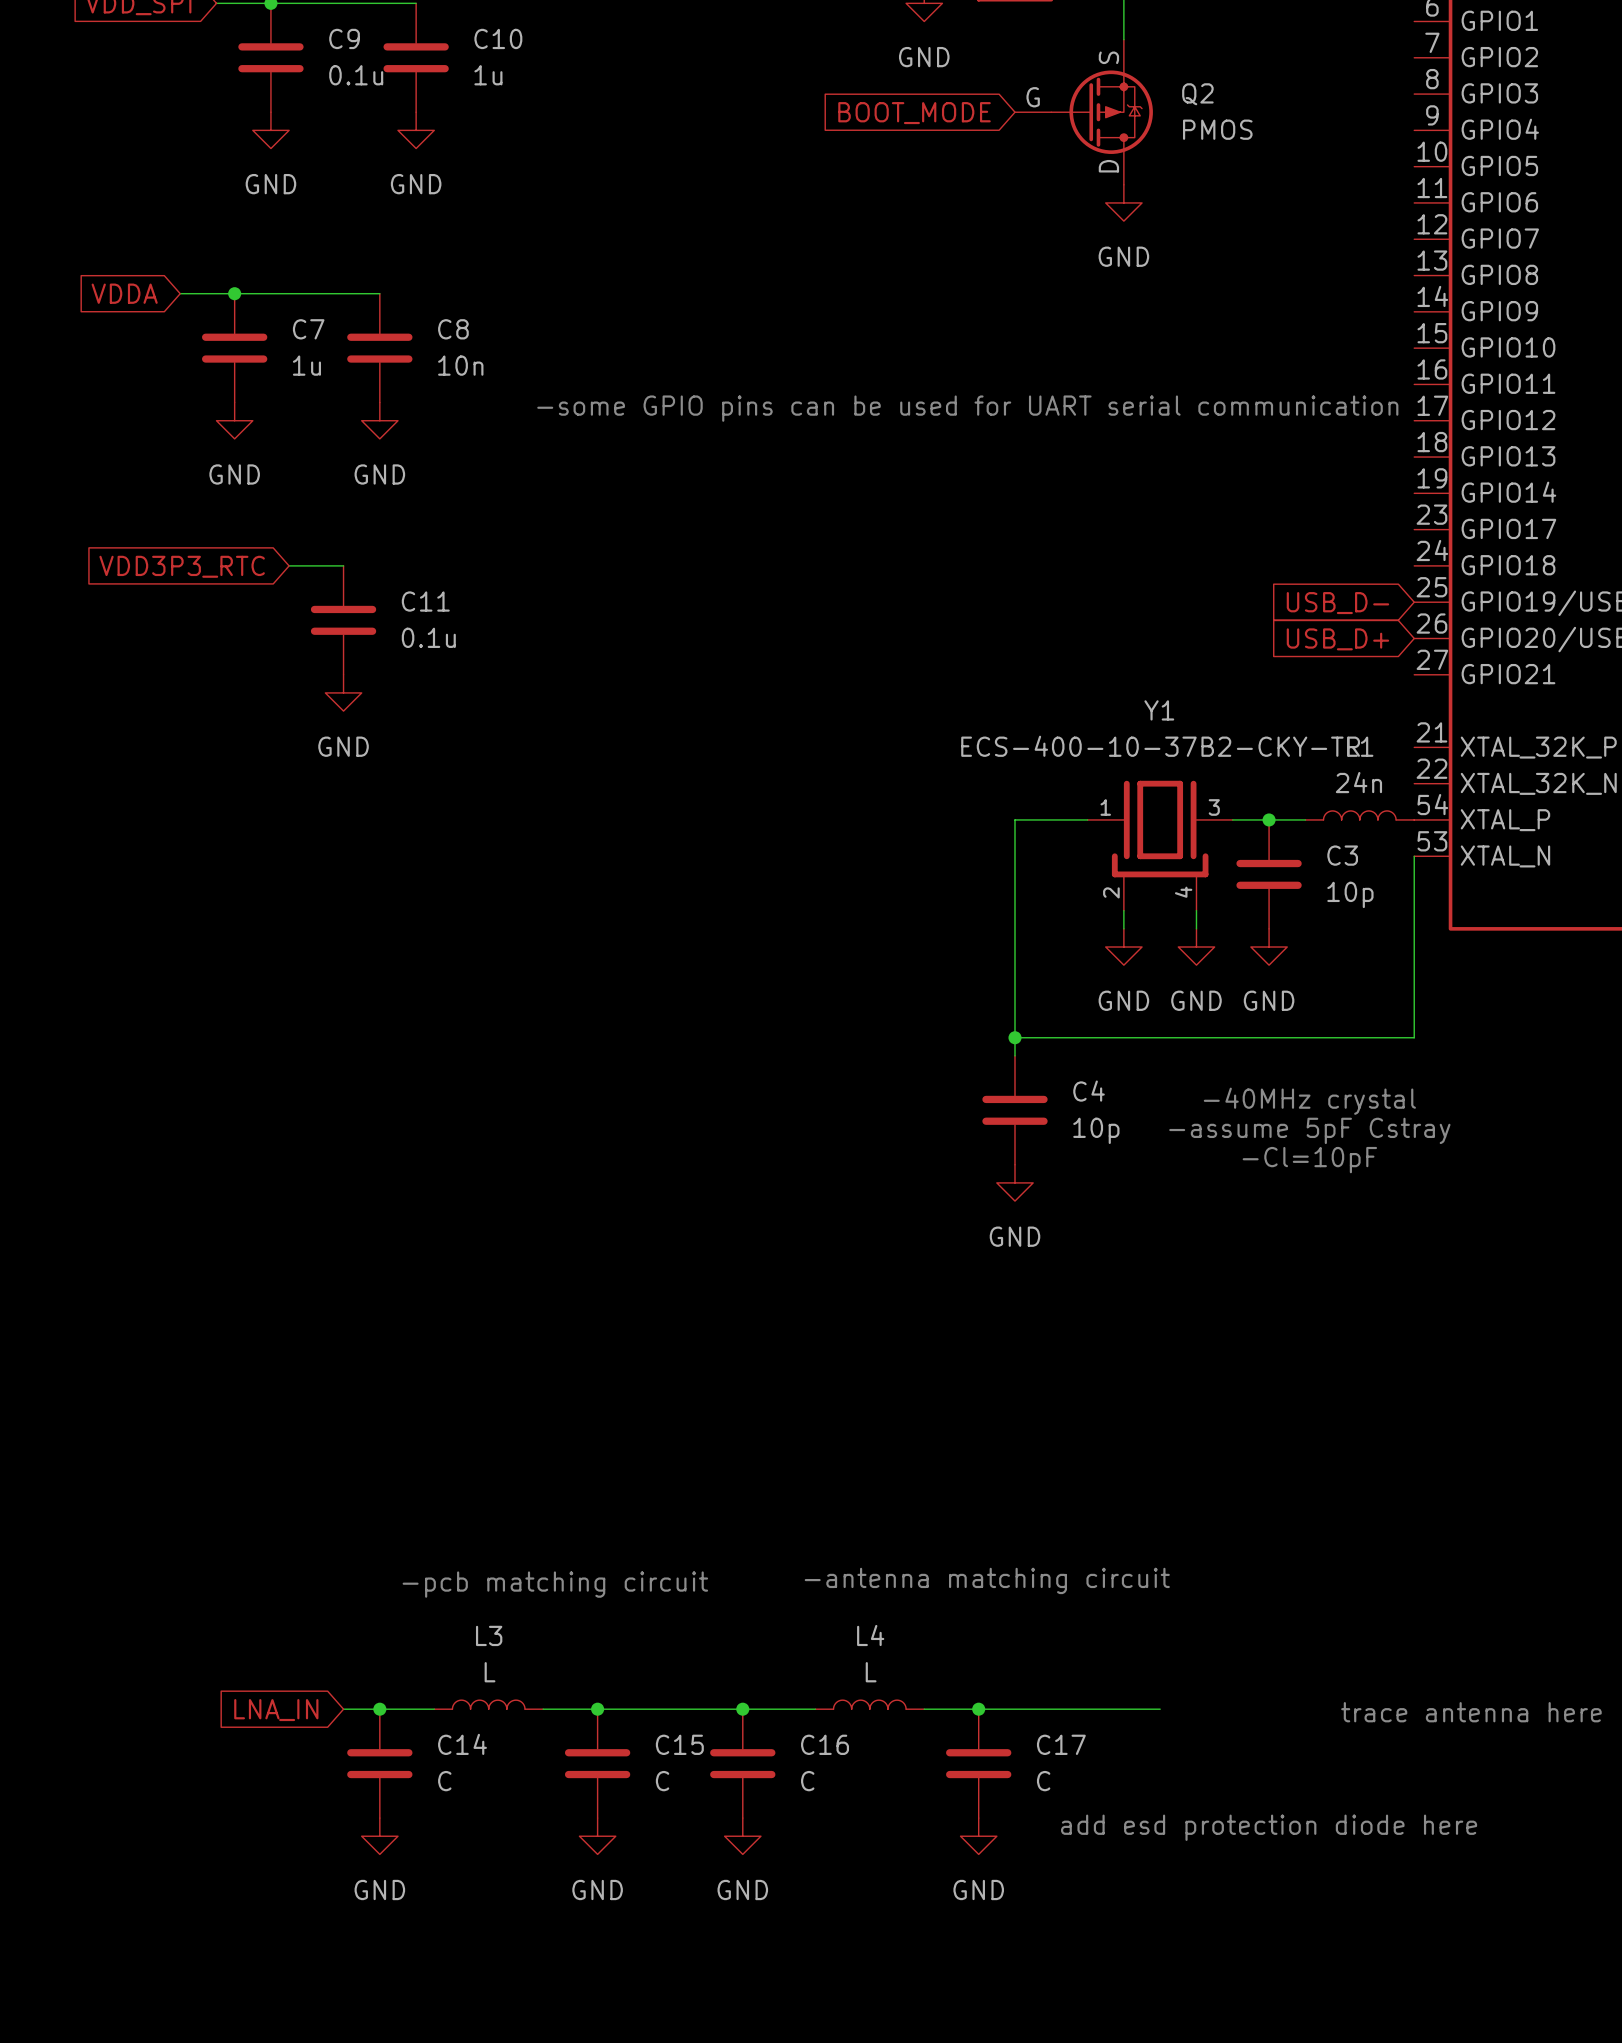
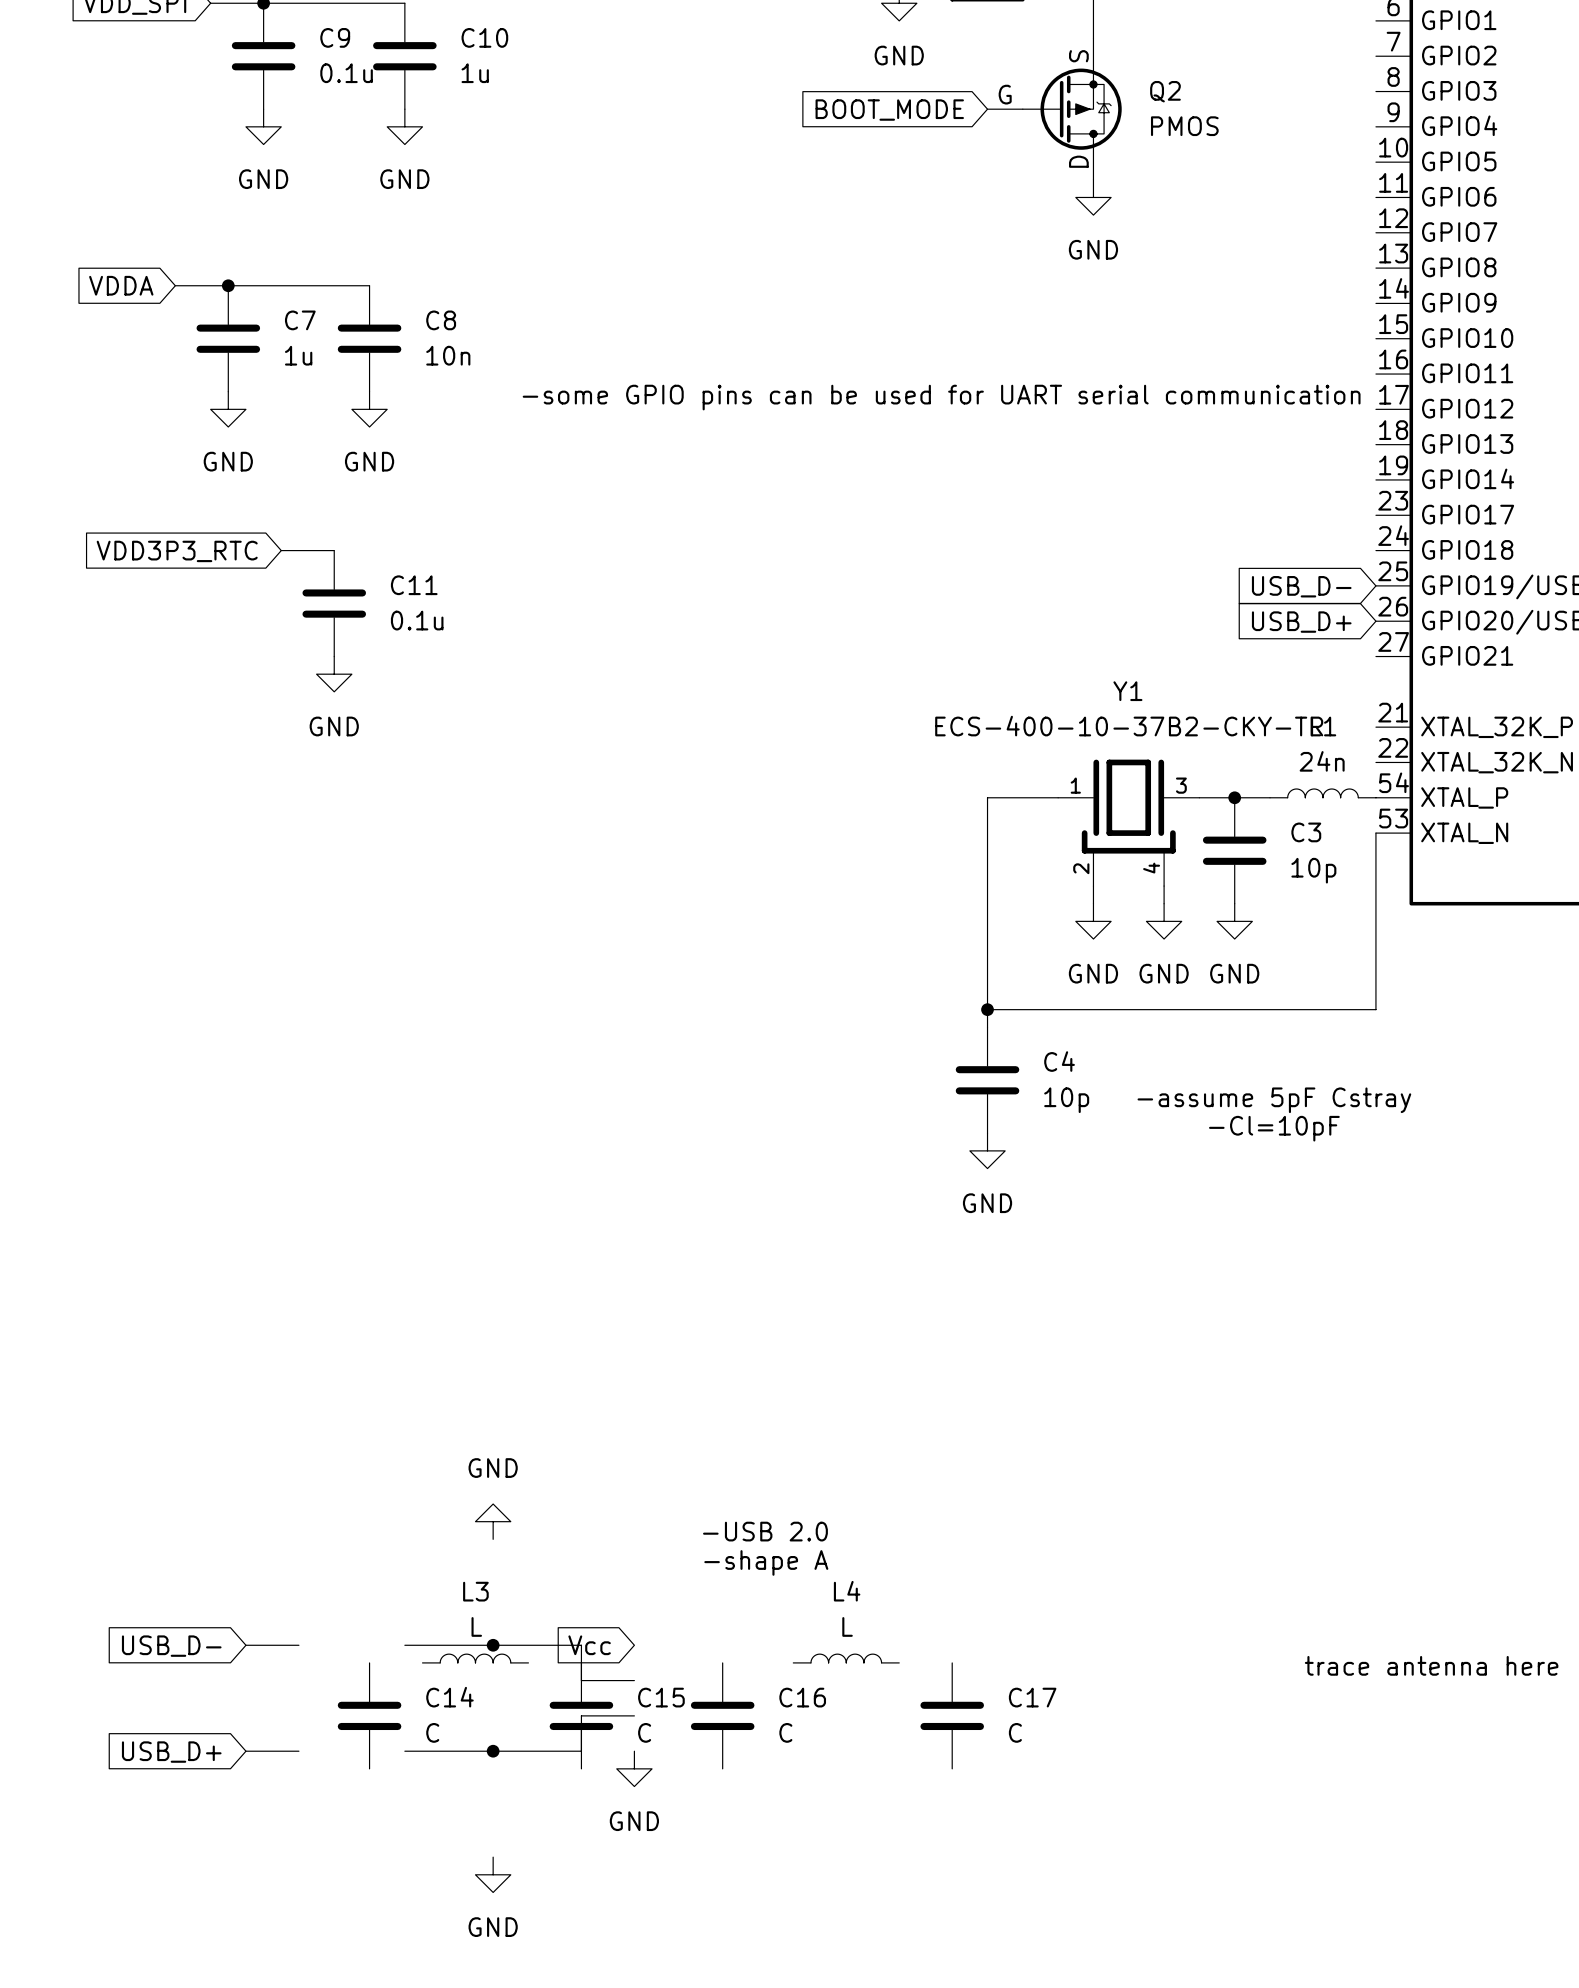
text: -40MHz crystal (1309, 1101) -> none
power symbol: none -> GND (493, 1521)
text: none -> -USB 2.0 (765, 1531)
text: -antenna matching circuit (987, 1580) -> none
text: -pcb matching circuit (555, 1584) -> none
text: none -> -shape A (766, 1562)
global label: none -> USB_D- (171, 1646)
wire: none -> (404, 1645) (581, 1645) (581, 1680) (634, 1680)
junction: none -> (493, 1645)
global label: none -> Vcc (589, 1645)
wire: (343, 1709) (434, 1709) -> none
junction: (379, 1709) -> none
wire: (543, 1709) (815, 1709) -> none
junction: (597, 1709) -> none
junction: (742, 1709) -> none
wire: (924, 1709) (1160, 1709) -> none
junction: (978, 1709) -> none
global label: LNA_IN (276, 1710) -> none
wire: none -> (634, 1715) (581, 1715) (581, 1751) (404, 1751)
wire: none -> (245, 1751) (298, 1751)
junction: none -> (493, 1751)
global label: none -> USB_D+ (171, 1752)
power symbol: none -> GND (634, 1768)
text: add esd protection diode here (1269, 1827) -> none
power symbol: GND (379, 1836) -> none
power symbol: GND (597, 1836) -> none
power symbol: GND (742, 1836) -> none
power symbol: GND (978, 1836) -> none
power symbol: none -> GND (493, 1874)

